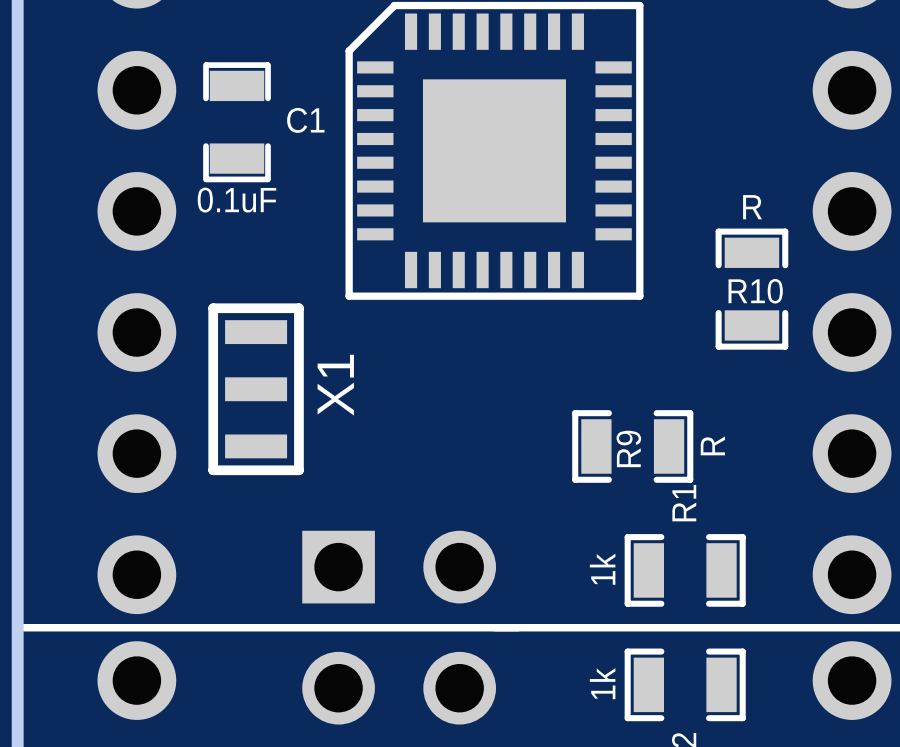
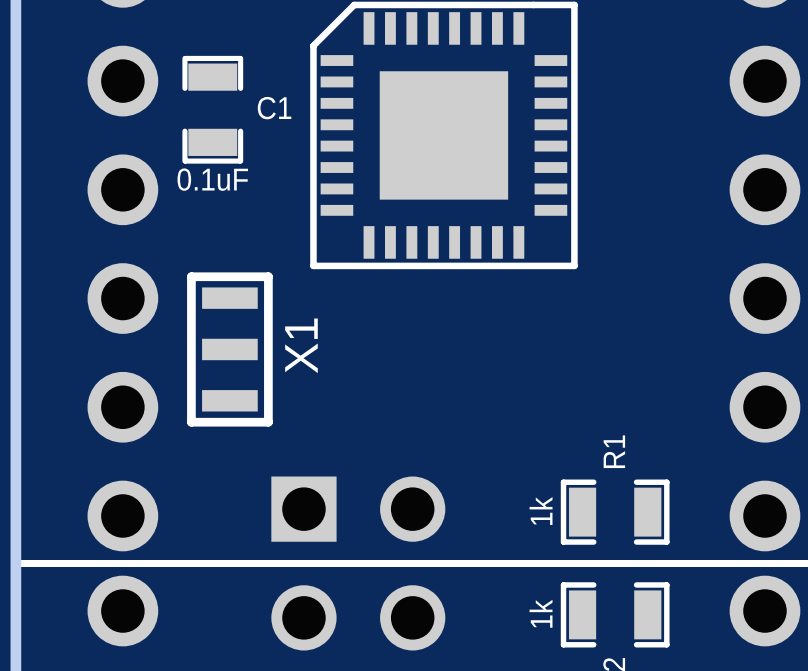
R10: R (751, 289) -> none
R9: R (632, 446) -> none

